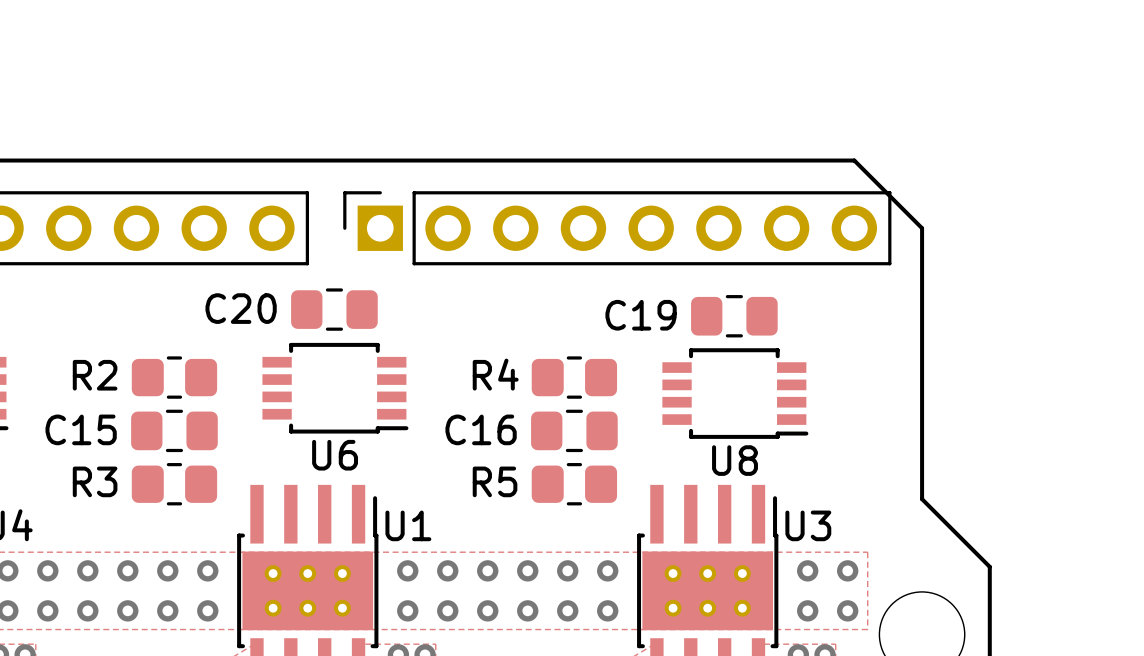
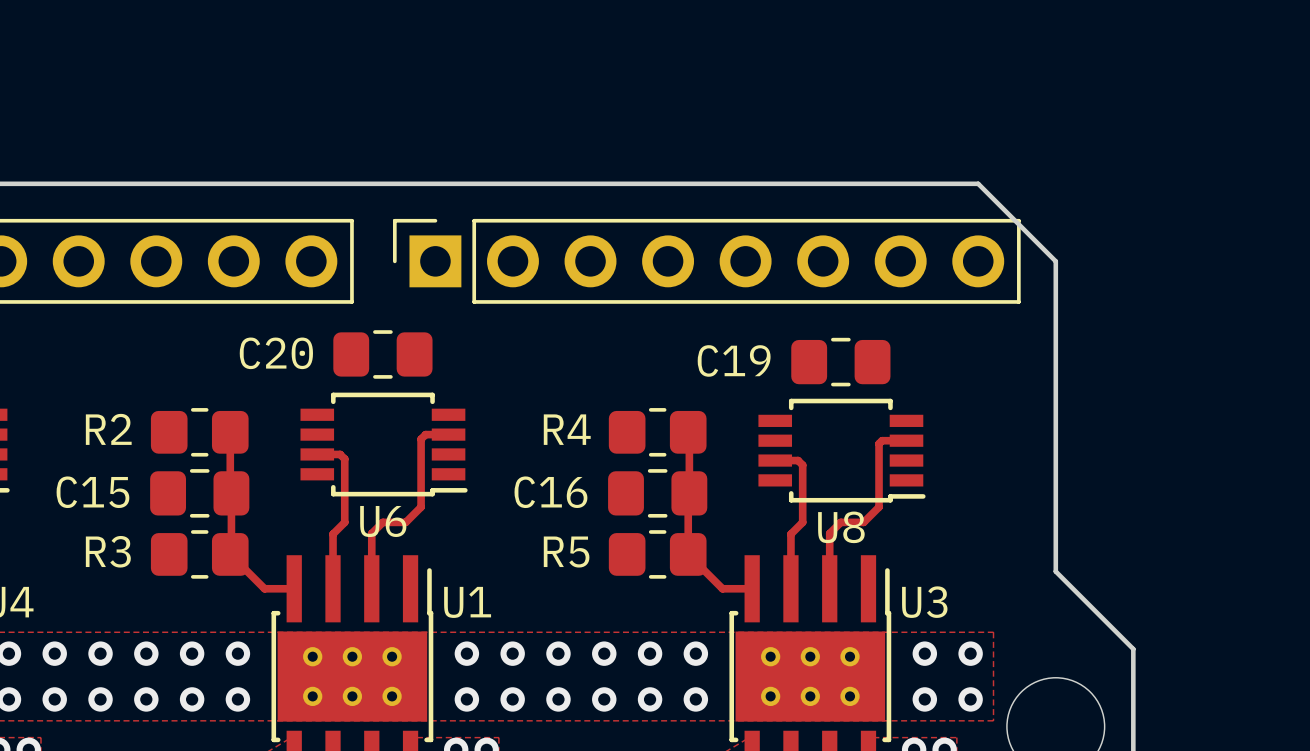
track: none -> (230, 432) (230, 554) (264, 588) (294, 588)
track: none -> (688, 432) (688, 554) (722, 588) (752, 588)
track: none -> (448, 434) (425, 434) (421, 439) (421, 507) (405, 522) (382, 522) (371, 533) (371, 588)
track: none -> (906, 440) (882, 440) (879, 443) (879, 507) (863, 522) (840, 522) (829, 533) (829, 588)
track: none -> (317, 454) (340, 454) (344, 459) (344, 522) (333, 534) (333, 588)
track: none -> (775, 460) (798, 460) (802, 465) (802, 522) (790, 534) (790, 588)

